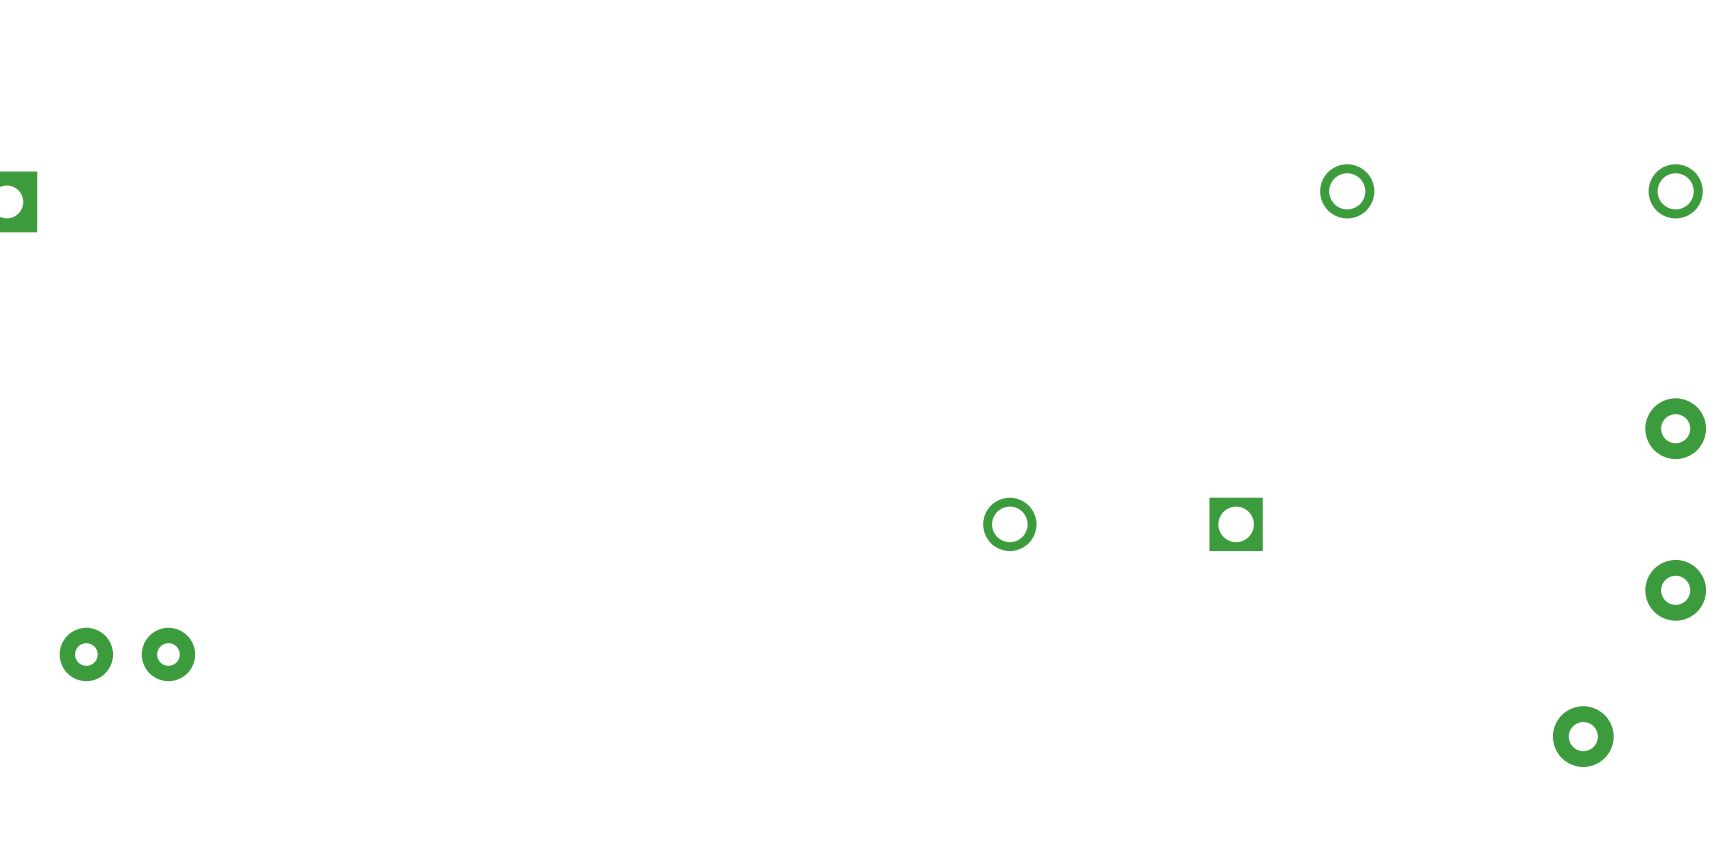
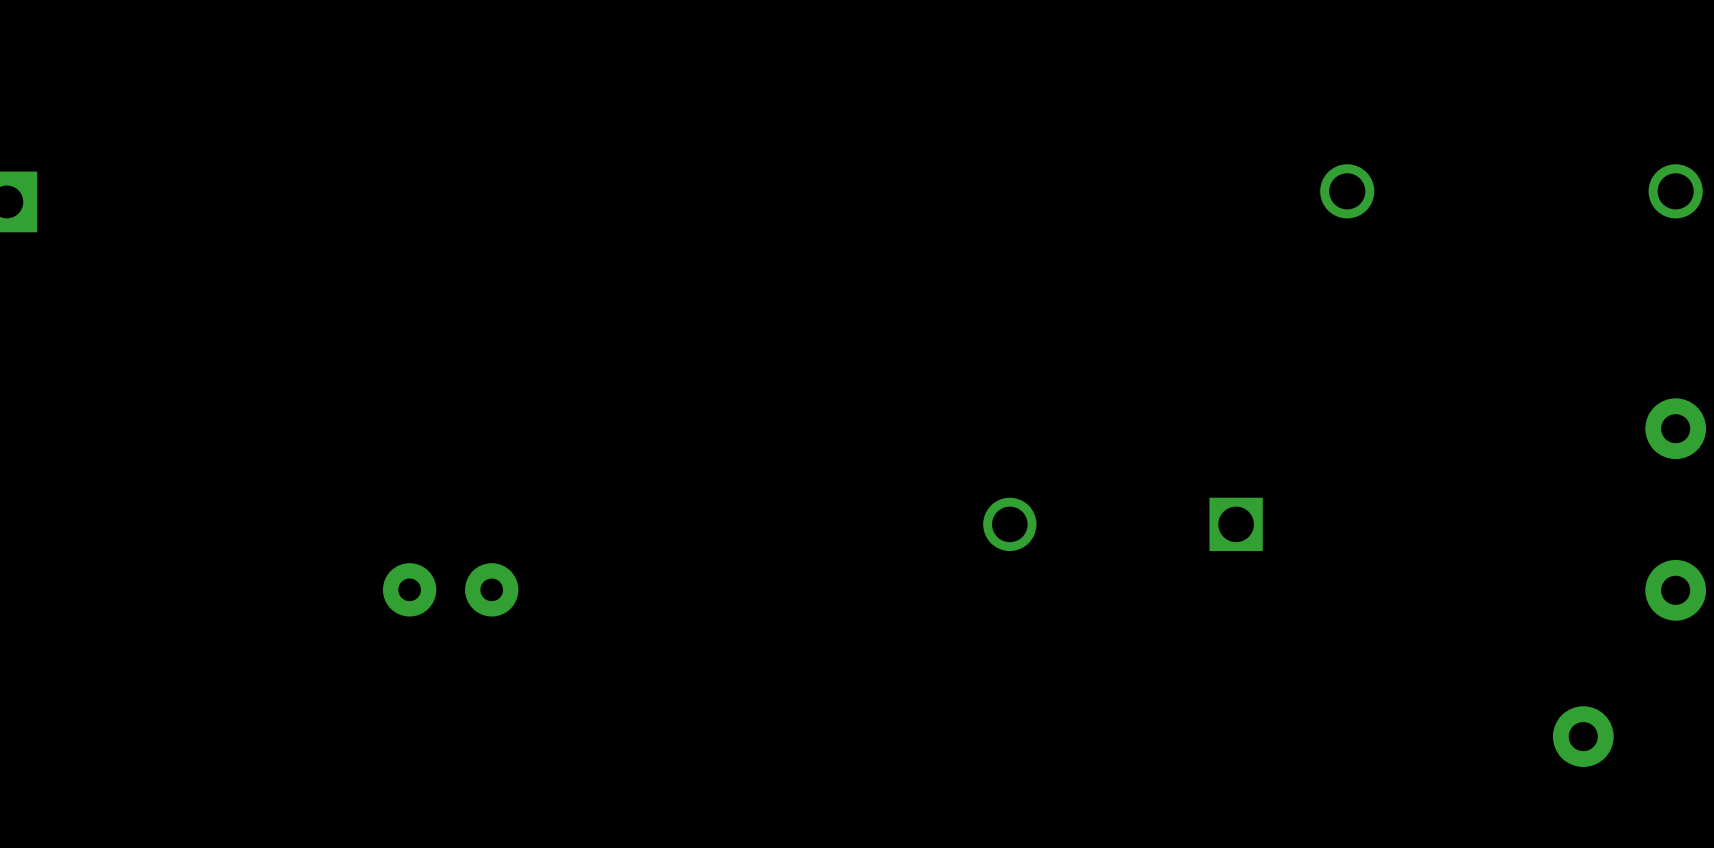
part position: (127, 654) -> (450, 589)

